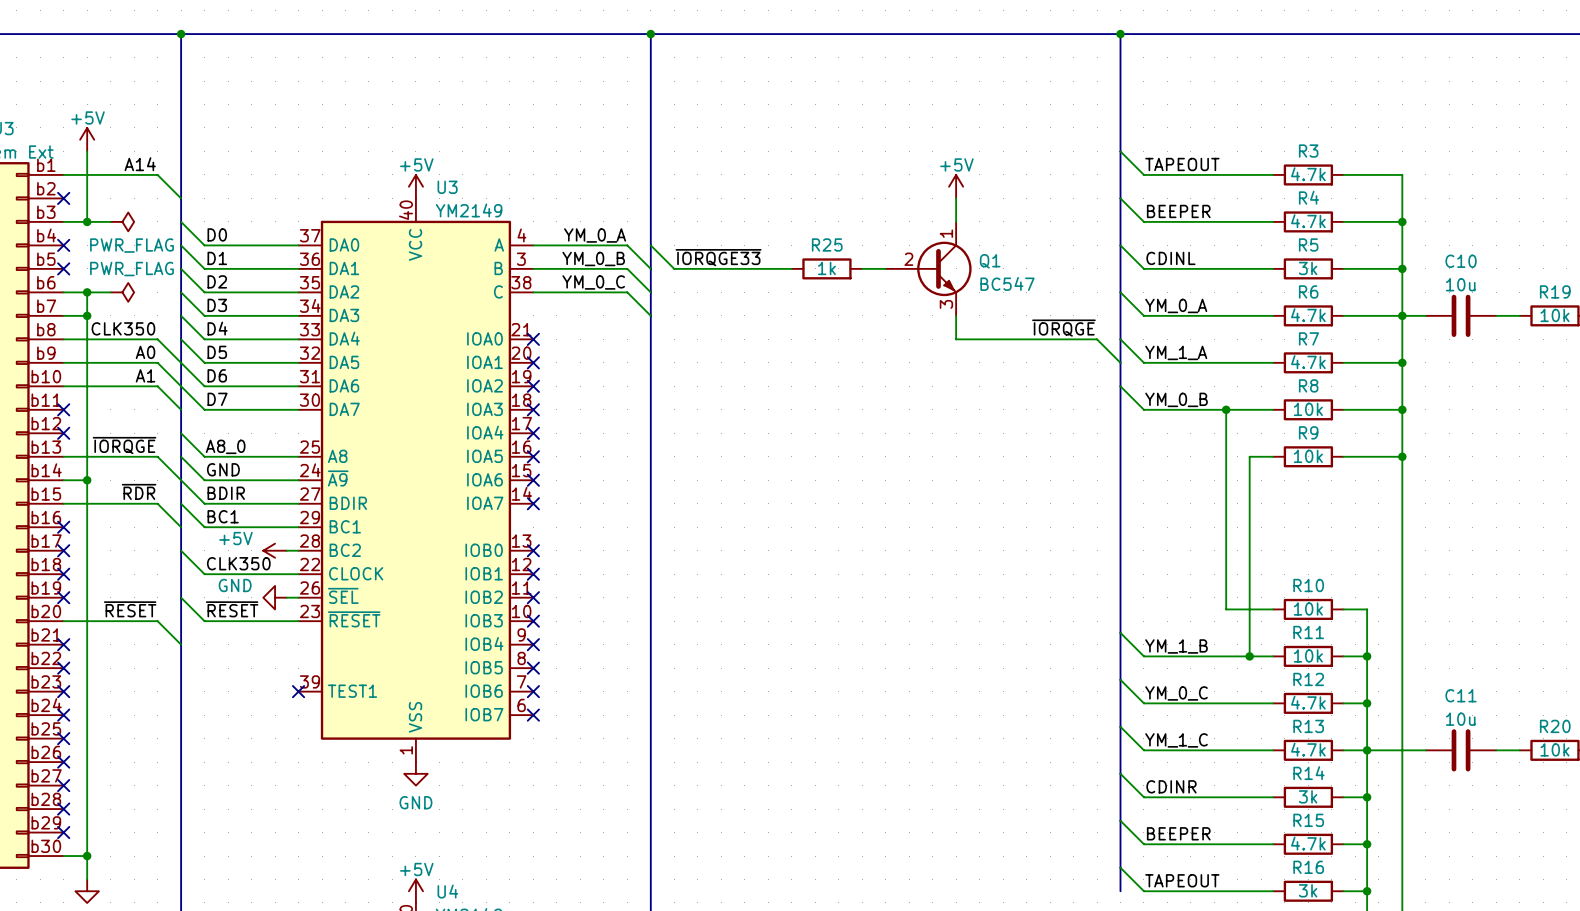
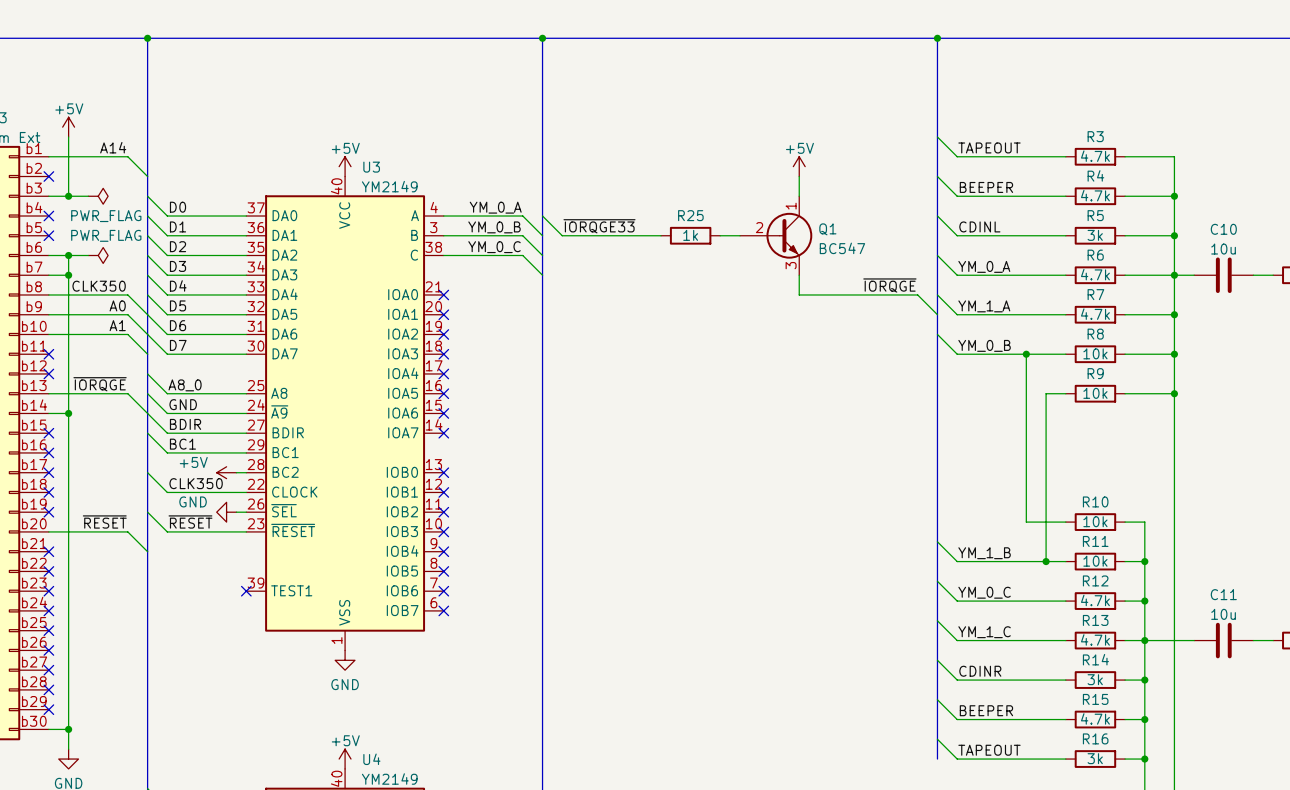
label: ~{RDR} (139, 491) -> none
wire: (63, 503) (157, 503) (181, 527) -> none
no-connect mark: none -> (48, 433)

